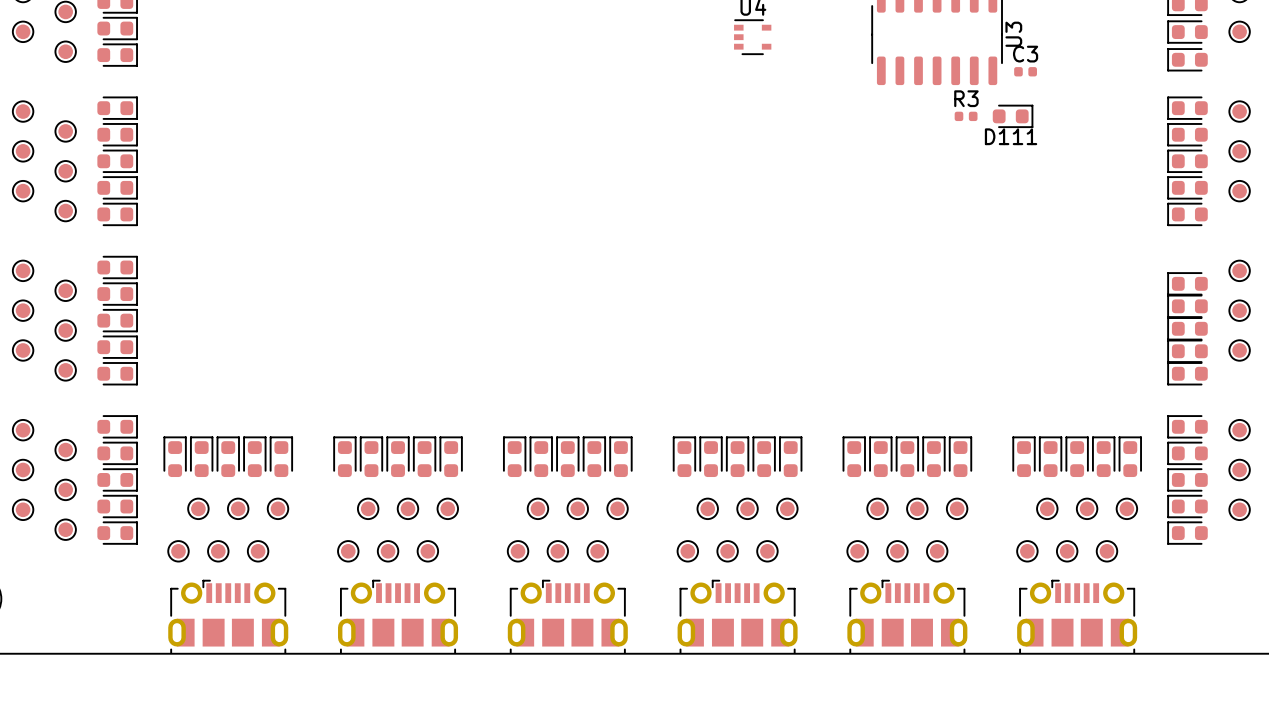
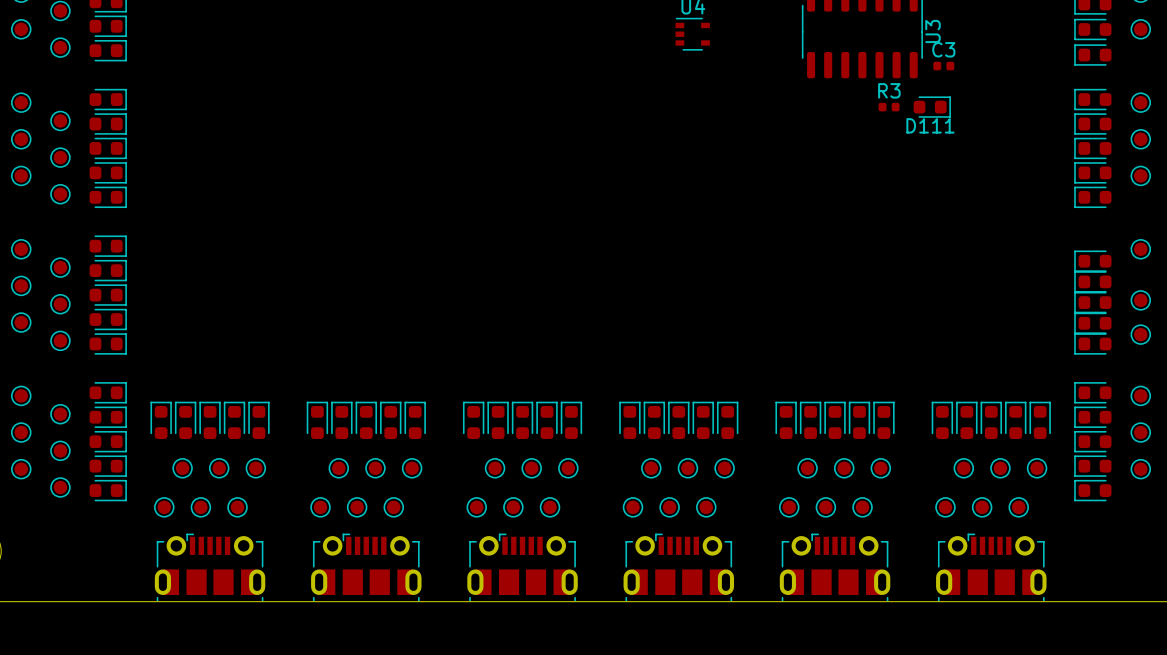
part: (1239, 310) -> none
part: none -> (1140, 300)
part: (1239, 350) -> none
part: none -> (1140, 334)

